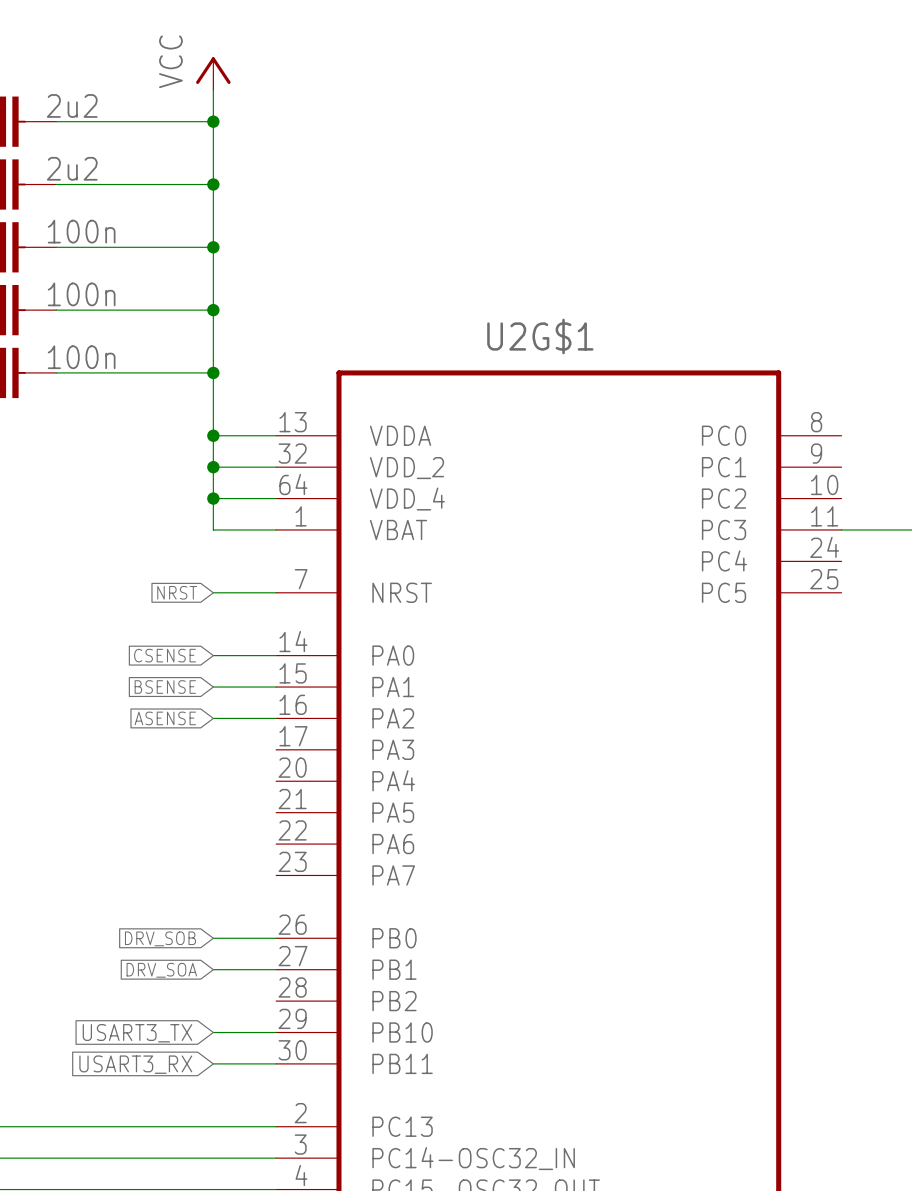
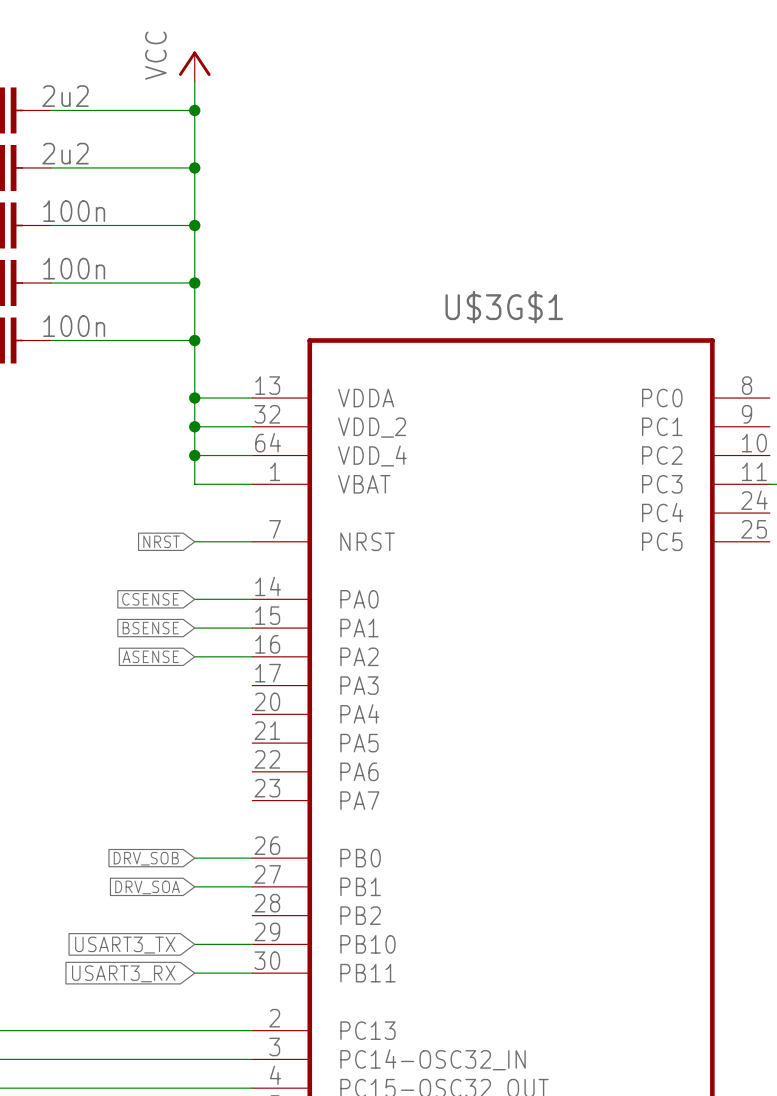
U2G$1 name: U2G$1 (540, 336) -> U$3G$1 (504, 307)

